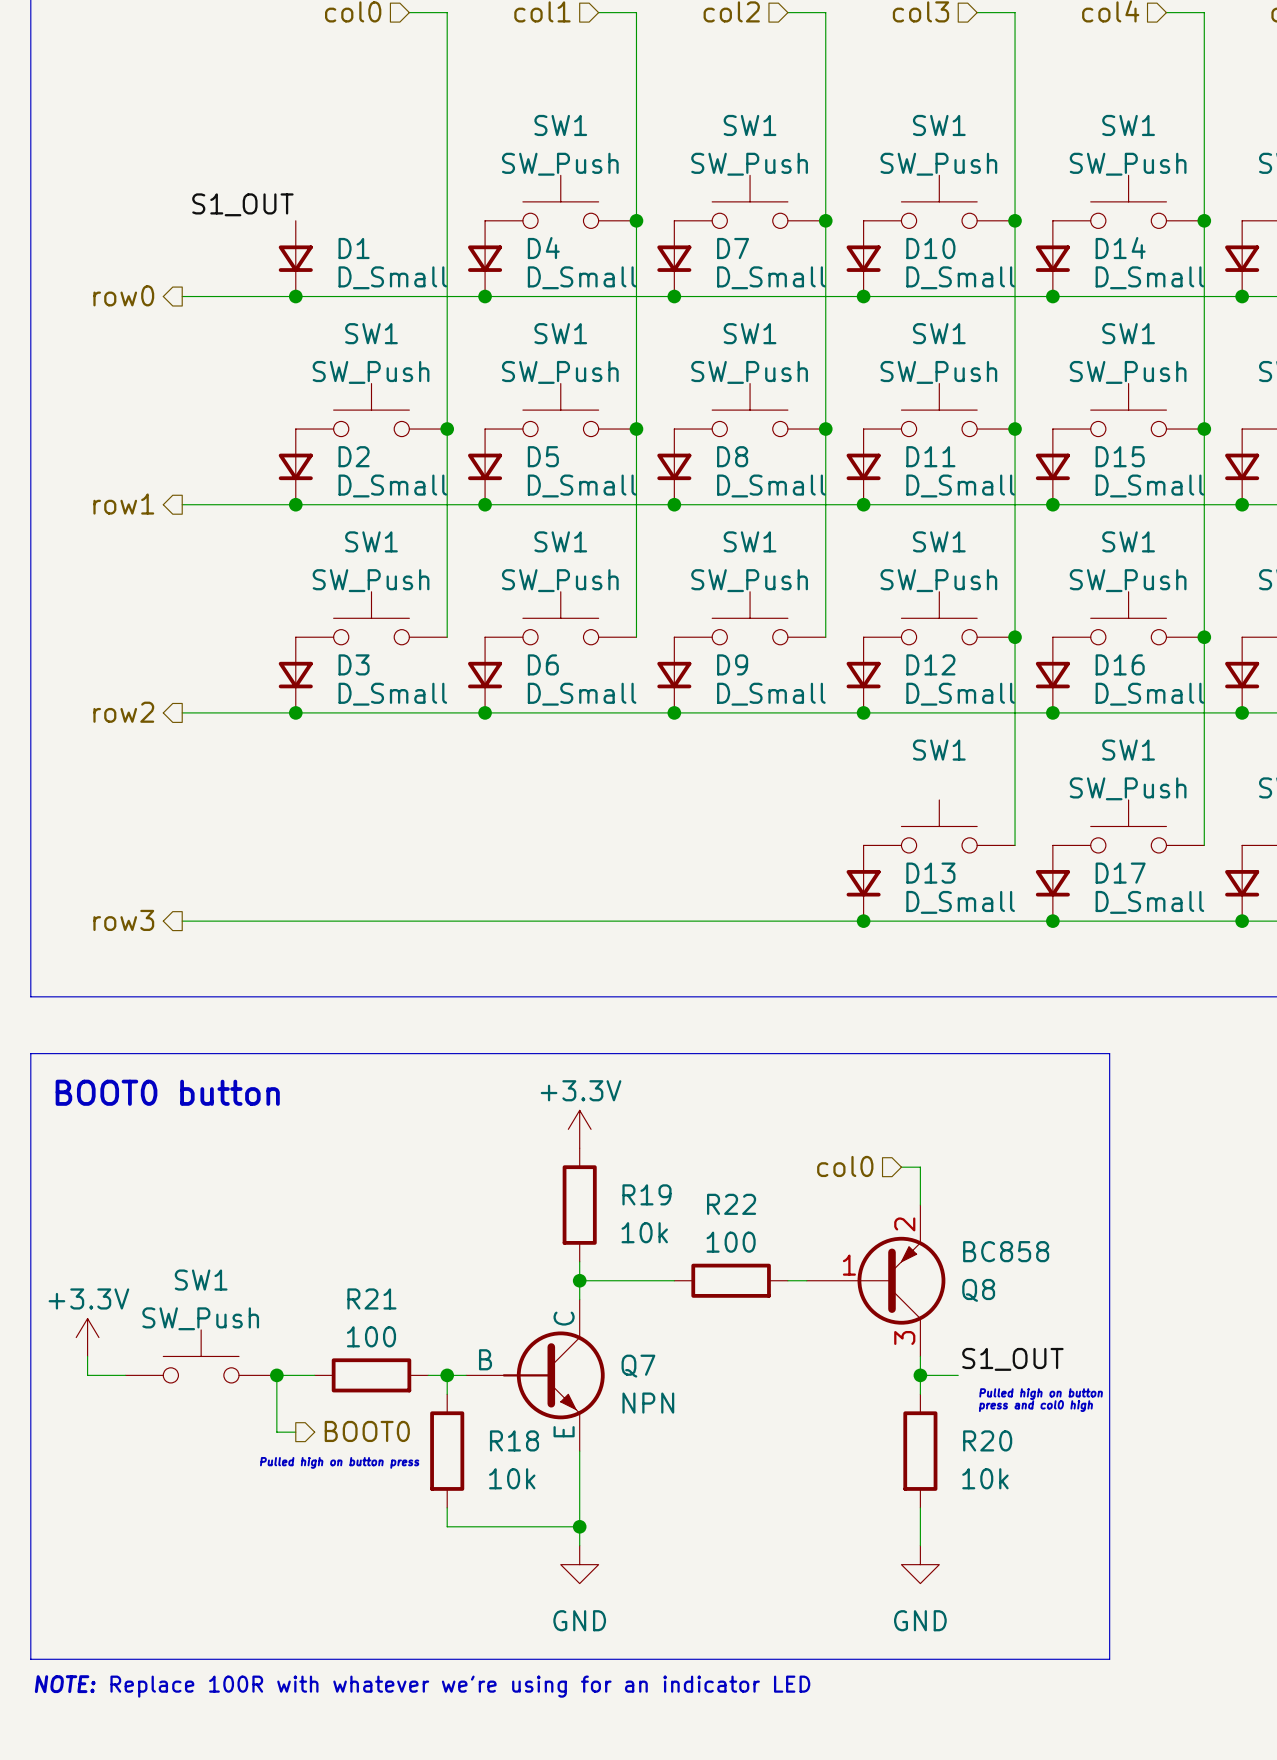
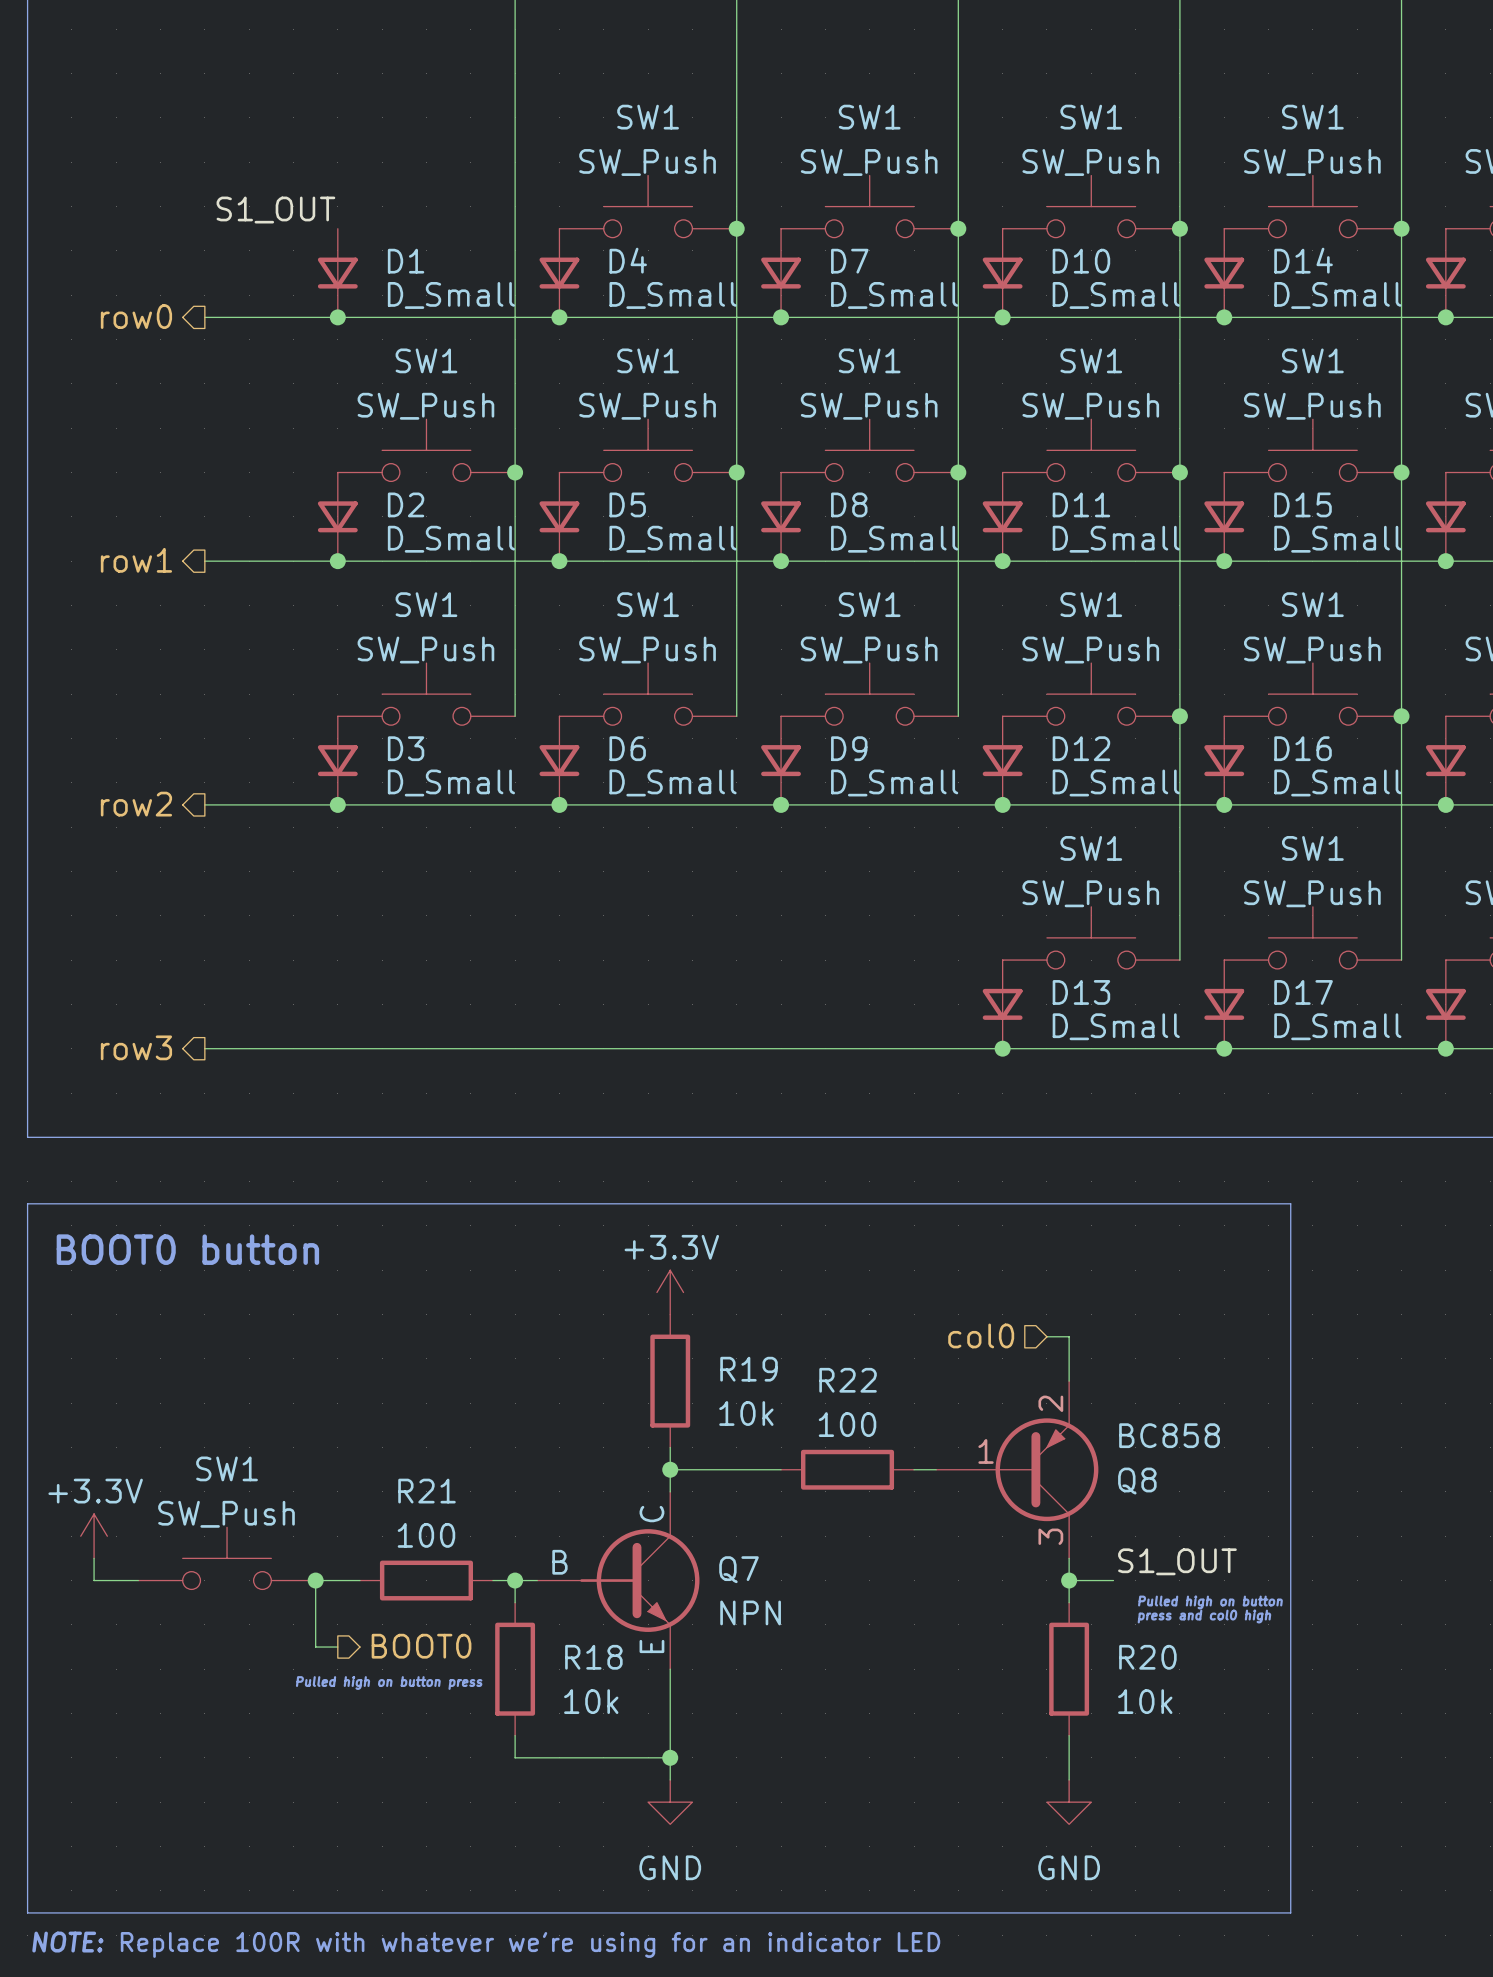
SW1 value: none -> SW_Push (1090, 893)

